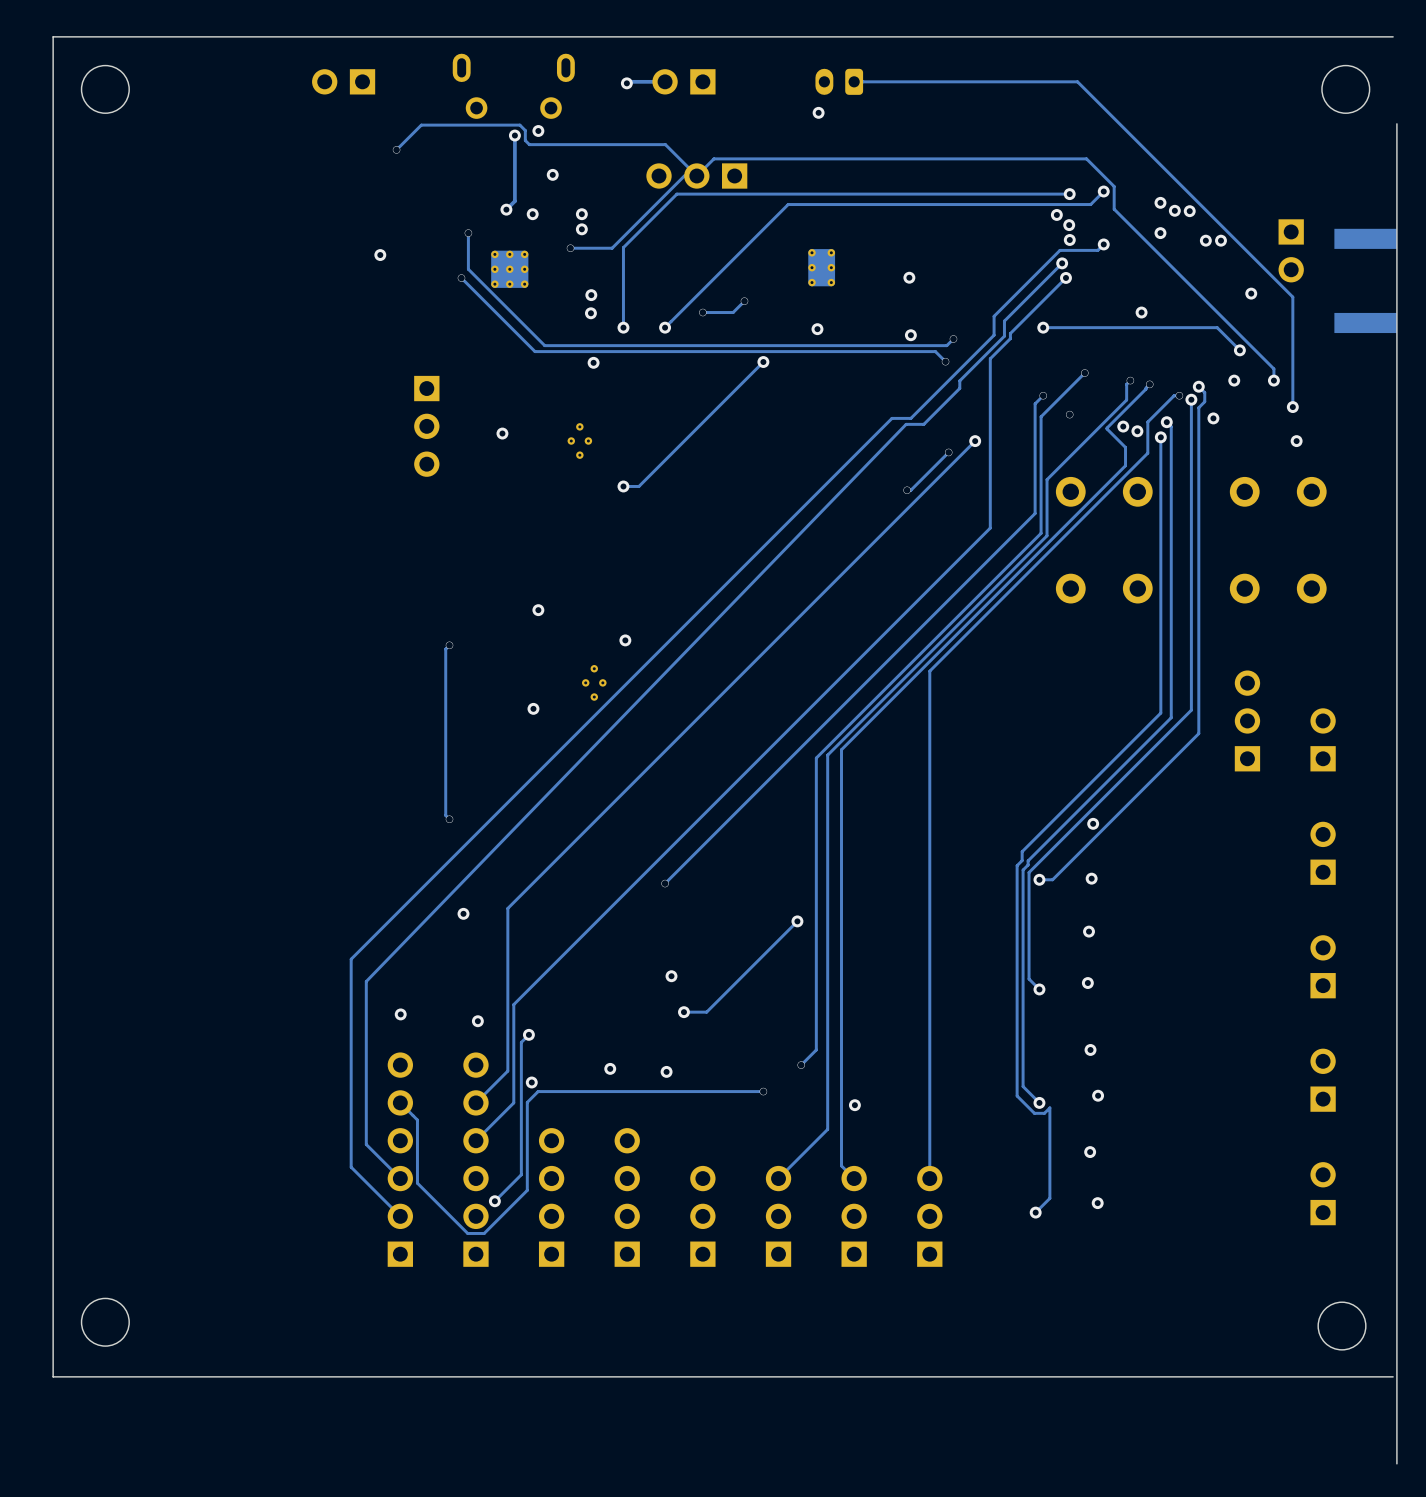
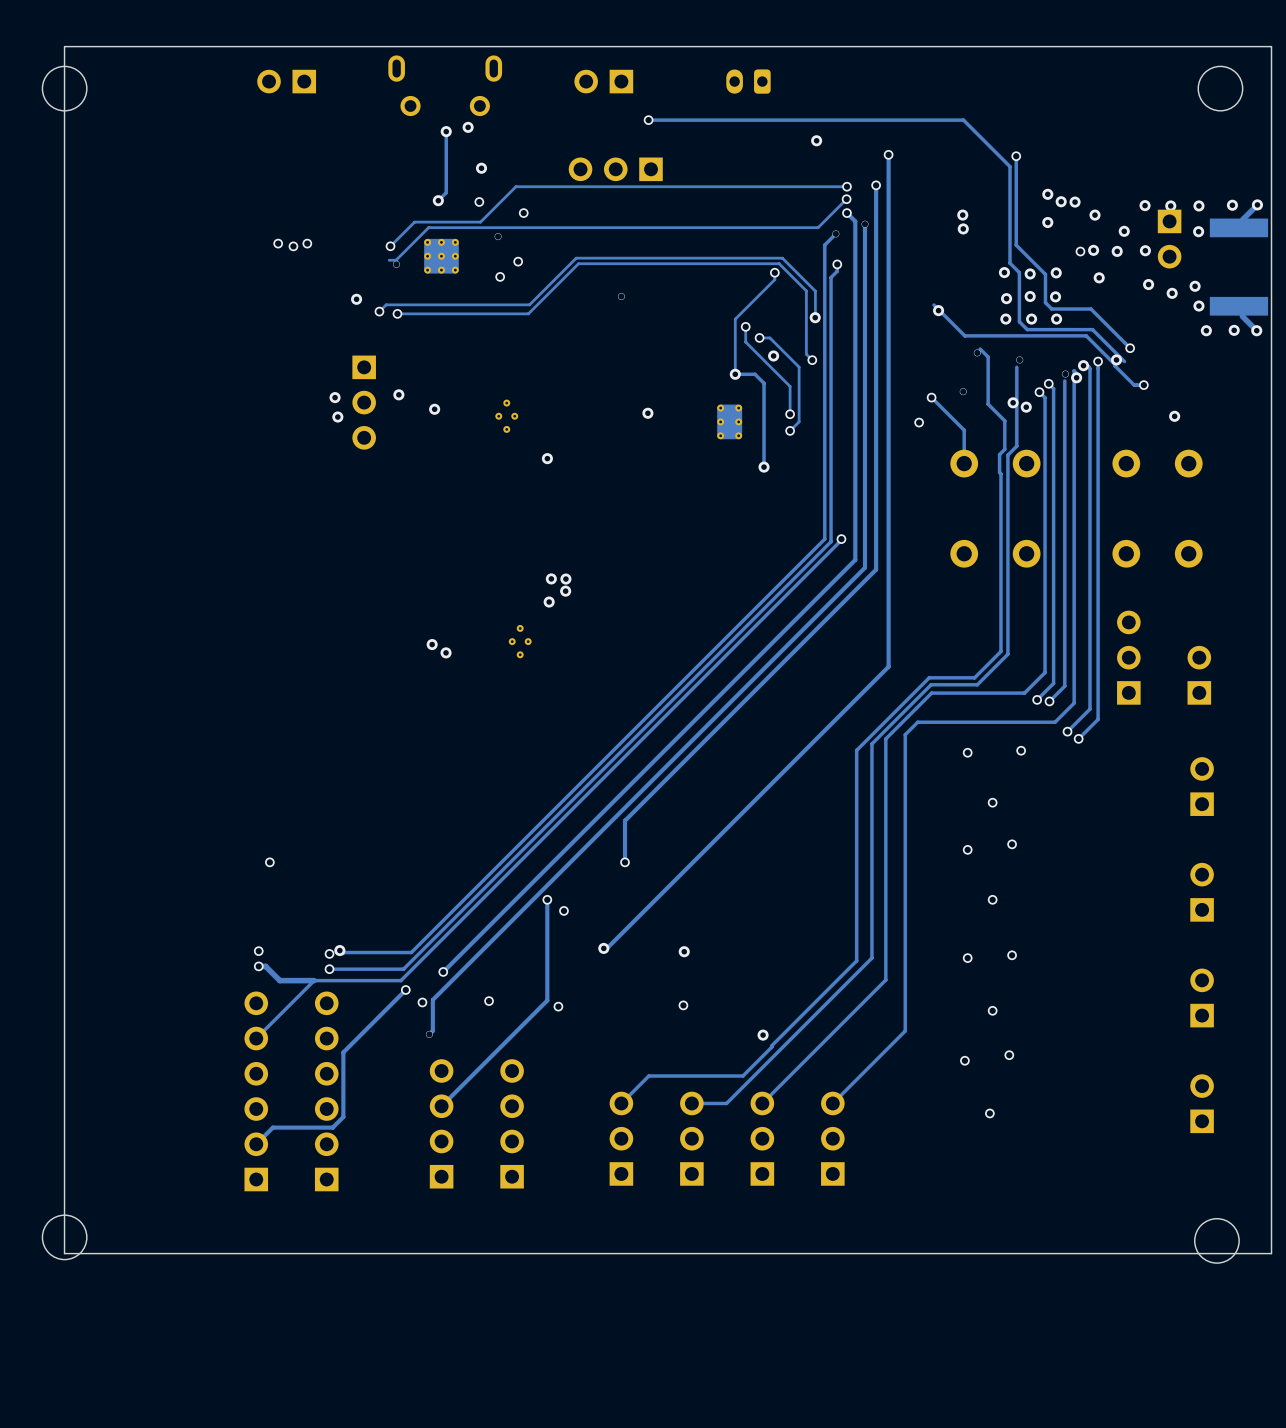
board edge: (1393, 36) (53, 36) (53, 1376) (1393, 1376) -> none
board edge: none -> (1271, 46) (1271, 1253) (64, 1253) (64, 46) (1271, 46)
track: (665, 81) (626, 83) -> none
track: (854, 81) (1077, 81) (1292, 297) (1292, 407) -> none
via: (626, 83) -> none
via: (818, 112) -> none
track: none -> (648, 120) (963, 120) (1009, 166) (1009, 263) (1019, 272) (1019, 321) (1027, 329) (1092, 329) (1124, 361)
via: none -> (648, 120)
board edge: (1396, 123) (1396, 1463) -> none
via: none -> (816, 140)
track: (396, 149) (421, 125) (519, 125) (525, 130) (525, 140) (529, 144) (665, 144) (696, 176) -> none
via: (396, 149) -> none
track: none -> (888, 154) (888, 666) (605, 949)
via: none -> (888, 154)
track: none -> (1016, 156) (1016, 245) (1045, 274) (1045, 302) (1051, 309) (1090, 309) (1130, 348)
via: none -> (1016, 156)
track: (696, 176) (713, 158) (1086, 158) (1114, 186) (1114, 209) (1273, 368) (1273, 380) -> none
track: (696, 176) (684, 176) (612, 248) (570, 248) -> none
track: (1103, 191) (1090, 204) (788, 204) (665, 327) -> none
via: (1103, 191) -> none
track: none -> (876, 185) (876, 569) (625, 820) (625, 862)
via: none -> (876, 185)
track: none -> (846, 186) (515, 186) (480, 222) (414, 222) (390, 246)
via: none -> (846, 186)
track: (1069, 194) (676, 194) (623, 247) (623, 327) -> none
via: (1069, 194) -> none
track: none -> (846, 199) (818, 227) (428, 227) (396, 260) (389, 260)
via: none -> (846, 199)
via: none -> (479, 201)
via: (532, 214) -> none
via: (581, 214) -> none
via: (1056, 214) -> none
via: none -> (1145, 205)
via: none -> (1232, 205)
track: none -> (1257, 204) (1242, 219)
via: none -> (1257, 204)
via: none -> (1170, 205)
via: none -> (1198, 205)
via: none -> (523, 213)
track: none -> (846, 213) (855, 221) (855, 559) (443, 971)
via: none -> (846, 213)
via: none -> (1095, 215)
via: (581, 229) -> none
track: (468, 233) (468, 269) (544, 345) (946, 345) (953, 338) -> none
via: (468, 233) -> none
track: none -> (865, 224) (865, 567) (432, 999) (432, 1030) (429, 1034)
via: none -> (865, 224)
via: (1205, 240) -> none
via: (1220, 240) -> none
via: none -> (1124, 231)
via: none -> (1198, 231)
track: (1103, 244) (1097, 250) (1059, 250) (994, 316) (994, 335) (910, 418) (891, 418) (351, 959) (351, 1167) (400, 1216) -> none
via: (1103, 244) -> none
track: none -> (835, 233) (824, 244) (824, 539) (411, 952) (343, 953)
via: none -> (835, 233)
via: none -> (278, 243)
via: none -> (307, 243)
via position: (380, 255) -> (356, 299)
via: none -> (293, 246)
via: none -> (390, 246)
via: none -> (1093, 250)
track: (1062, 263) (1004, 321) (1004, 336) (959, 380) (959, 388) (923, 424) (906, 424) (366, 981) (366, 1144) (400, 1178) -> none
via: (1062, 263) -> none
via: none -> (1145, 250)
via: none -> (1080, 251)
via: none -> (1117, 251)
part position: (821, 267) -> (729, 421)
via: none -> (518, 261)
via: (909, 277) -> none
track: (1065, 277) (1010, 333) (1010, 338) (990, 358) (990, 528) (513, 1004) (513, 1102) (475, 1140) -> none
via: (1065, 277) -> none
track: (461, 278) (535, 351) (935, 351) (945, 361) -> none
track: none -> (837, 264) (837, 271) (831, 277) (831, 541) (403, 969) (329, 969)
via: none -> (837, 264)
via: none -> (1004, 272)
track: none -> (774, 272) (774, 279) (735, 319) (735, 374) (755, 374) (764, 383) (764, 467)
via: none -> (774, 272)
via: none -> (1056, 272)
via: none -> (1030, 273)
via: none -> (500, 276)
via: none -> (1099, 277)
via: (1251, 293) -> none
via: (591, 295) -> none
via: none -> (1148, 284)
track: (744, 301) (733, 312) (702, 312) -> none
via: (744, 301) -> none
via: none -> (1195, 286)
via: none -> (1172, 293)
via: none -> (1055, 296)
via: (590, 313) -> none
via: none -> (1006, 298)
track: none -> (934, 305) (964, 335) (1086, 335) (1134, 385) (1143, 385)
via: none -> (1198, 306)
via: (623, 327) -> none
via: (665, 327) -> none
track: (1043, 327) (1217, 327) (1239, 350) -> none
track: none -> (379, 311) (386, 304) (529, 304) (576, 258) (782, 258) (815, 291) (815, 321)
via: none -> (379, 311)
via: (817, 329) -> none
track: none -> (397, 313) (528, 313) (578, 263) (779, 263) (806, 290) (806, 354) (812, 360)
via: none -> (397, 313)
track: none -> (1242, 316) (1256, 330)
via: none -> (1005, 319)
via: none -> (1031, 319)
via: none -> (1056, 319)
via: (953, 338) -> none
track: none -> (745, 326) (745, 342) (790, 386) (790, 414)
via: none -> (745, 326)
via: none -> (1234, 330)
via: none -> (1206, 330)
via: none -> (1256, 330)
via: (1239, 350) -> none
track: none -> (759, 337) (769, 337) (799, 367) (799, 421) (790, 430)
via: none -> (759, 337)
via: (945, 361) -> none
via: (593, 362) -> none
track: (763, 362) (638, 486) (623, 486) -> none
via: (763, 362) -> none
via: none -> (1130, 348)
track: none -> (980, 349) (988, 357) (988, 404) (1004, 420) (1004, 449) (999, 454) (1000, 651) (974, 677) (929, 677) (856, 750) (856, 960) (742, 1076) (648, 1076) (621, 1103)
track: (1084, 373) (1041, 416) (1041, 533) (816, 758) (816, 1049) (801, 1065) -> none
via: none -> (773, 355)
via: none -> (812, 360)
track: (1130, 380) (1126, 384) (1126, 400) (1047, 479) (1047, 535) (827, 755) (827, 1129) (778, 1178) -> (1016, 367) (1016, 446) (1007, 455) (1007, 654) (977, 684) (931, 684) (871, 743) (871, 958) (726, 1103) (691, 1103)
via: (1273, 380) -> none
track: none -> (1098, 361) (1098, 719) (1078, 738)
via: none -> (1098, 361)
track: none -> (1084, 362) (1089, 368) (1089, 709) (1067, 731)
track: (1149, 384) (1107, 428) (1125, 447) (1125, 465) (841, 749) (841, 1165) (854, 1178) -> (1039, 392) (1045, 397) (1045, 672) (1024, 693) (931, 693) (885, 738) (885, 980) (762, 1103)
via: (1149, 384) -> none
track: (1198, 386) (1204, 392) (1204, 401) (1198, 407) (1198, 733) (1052, 879) (1039, 879) -> none
via: none -> (735, 374)
track: (1043, 395) (1035, 403) (1035, 513) (665, 883) -> none
via: (1043, 395) -> none
track: (1179, 395) (1174, 395) (1147, 422) (1147, 453) (929, 671) (929, 1178) -> (1075, 372) (1074, 370) (1074, 703) (1055, 722) (917, 722) (905, 734) (905, 1031) (832, 1103)
track: (1191, 399) (1191, 710) (1029, 872) (1029, 979) (1039, 989) -> none
track: none -> (1064, 380) (1064, 686) (1049, 701)
track: none -> (1048, 383) (1053, 388) (1053, 683) (1037, 699)
via: none -> (1048, 383)
via: none -> (1143, 385)
via: (1292, 407) -> none
via: none -> (1039, 392)
via: none -> (398, 394)
via: (1213, 418) -> none
via: none -> (335, 397)
track: none -> (931, 397) (964, 430) (964, 463)
via: none -> (931, 397)
track: (1166, 422) (1171, 426) (1171, 717) (1028, 860) (1028, 865) (1023, 870) (1023, 1086) (1039, 1102) -> none
via: (1166, 422) -> none
via: none -> (647, 413)
track: (1160, 437) (1160, 713) (1022, 851) (1022, 860) (1017, 865) (1017, 1096) (1034, 1113) (1044, 1113) (1049, 1107) (1049, 1198) (1035, 1212) -> none
via: (1160, 437) -> none
via: none -> (790, 414)
via: none -> (337, 417)
track: (975, 441) (507, 908) (507, 1071) (475, 1102) -> none
via: (975, 441) -> none
via: none -> (919, 422)
track: (948, 452) (910, 490) (907, 490) -> none
via: (948, 452) -> none
via: none -> (790, 430)
via: (907, 490) -> none
via: none -> (764, 467)
via: none -> (841, 539)
track: none -> (840, 541) (400, 980) (314, 980)
via: (538, 610) -> none
via: none -> (551, 578)
via: none -> (565, 579)
via: none -> (565, 591)
track: (449, 645) (445, 649) (445, 815) (449, 819) -> none
via: (449, 645) -> none
via: none -> (432, 644)
via: none -> (446, 652)
via: (533, 708) -> none
part position: (1247, 720) -> (1128, 657)
part position: (1323, 739) -> (1199, 675)
via: none -> (1037, 699)
via: none -> (1049, 701)
via: none -> (1067, 731)
via: none -> (1078, 738)
via: none -> (1021, 750)
via: none -> (967, 752)
via: (449, 819) -> none
via: (1093, 823) -> none
part position: (1323, 853) -> (1202, 786)
via: none -> (992, 802)
via: (1091, 878) -> none
via: (1039, 879) -> none
via: (665, 883) -> none
via: none -> (1012, 844)
via: none -> (967, 849)
via: (463, 913) -> none
via: none -> (269, 862)
via: none -> (625, 862)
track: (797, 921) (706, 1012) (683, 1012) -> none
via: (797, 921) -> none
via: (1089, 931) -> none
track: none -> (547, 899) (547, 1000) (441, 1106)
via: none -> (547, 899)
via: none -> (992, 899)
part position: (1323, 966) -> (1202, 892)
via: none -> (563, 910)
via: (671, 976) -> none
via: (1087, 983) -> none
via: (1039, 989) -> none
via: none -> (258, 951)
via: none -> (684, 951)
via: none -> (329, 953)
via: none -> (1012, 955)
via: (477, 1021) -> none
via: none -> (967, 958)
track: none -> (258, 966) (265, 966) (279, 980) (314, 980)
via: none -> (258, 966)
via: none -> (329, 969)
track: (528, 1034) (521, 1042) (521, 1174) (494, 1201) -> none
via: (528, 1034) -> none
via: none -> (443, 971)
track: none -> (314, 980) (256, 1038)
via: (1090, 1049) -> none
track: none -> (405, 989) (343, 1052) (343, 1117) (332, 1127) (272, 1127) (256, 1144)
via: none -> (405, 989)
via: (801, 1065) -> none
via: none -> (489, 1001)
via: (610, 1068) -> none
via: none -> (422, 1002)
via: (666, 1071) -> none
via: none -> (683, 1005)
via: none -> (558, 1006)
via: none -> (992, 1010)
part position: (1323, 1080) -> (1202, 997)
via: (531, 1082) -> none
track: (763, 1091) (538, 1091) (527, 1102) (527, 1190) (484, 1233) (467, 1233) (417, 1183) (417, 1120) (400, 1102) -> none
via: (763, 1091) -> none
via: (1098, 1095) -> none
via: (1039, 1102) -> none
via: none -> (429, 1034)
via: none -> (1009, 1055)
via: none -> (964, 1060)
via: (1090, 1152) -> none
part position: (400, 1159) -> (326, 1091)
part: (475, 1159) -> none
part: none -> (256, 1091)
via: none -> (989, 1113)
part position: (1323, 1193) -> (1202, 1103)
part: (551, 1197) -> none
part: (627, 1197) -> none
part: none -> (441, 1123)
part: none -> (512, 1123)
via: (494, 1201) -> none
via: (1097, 1203) -> none
via: (1035, 1212) -> none

